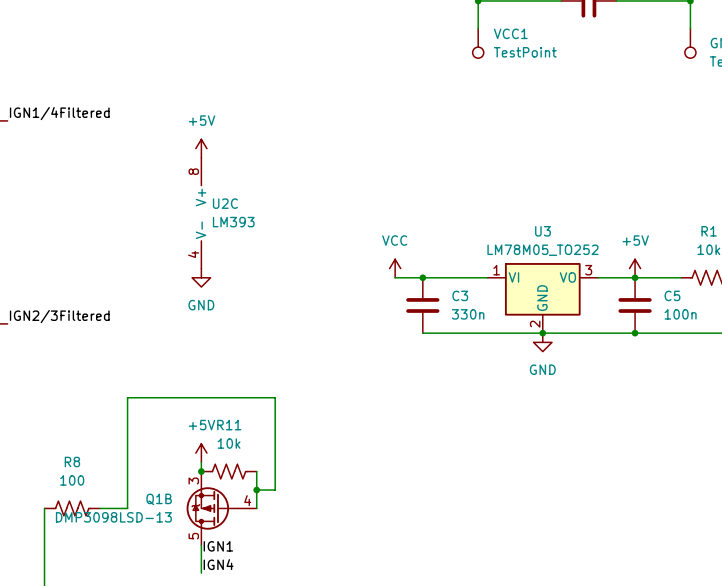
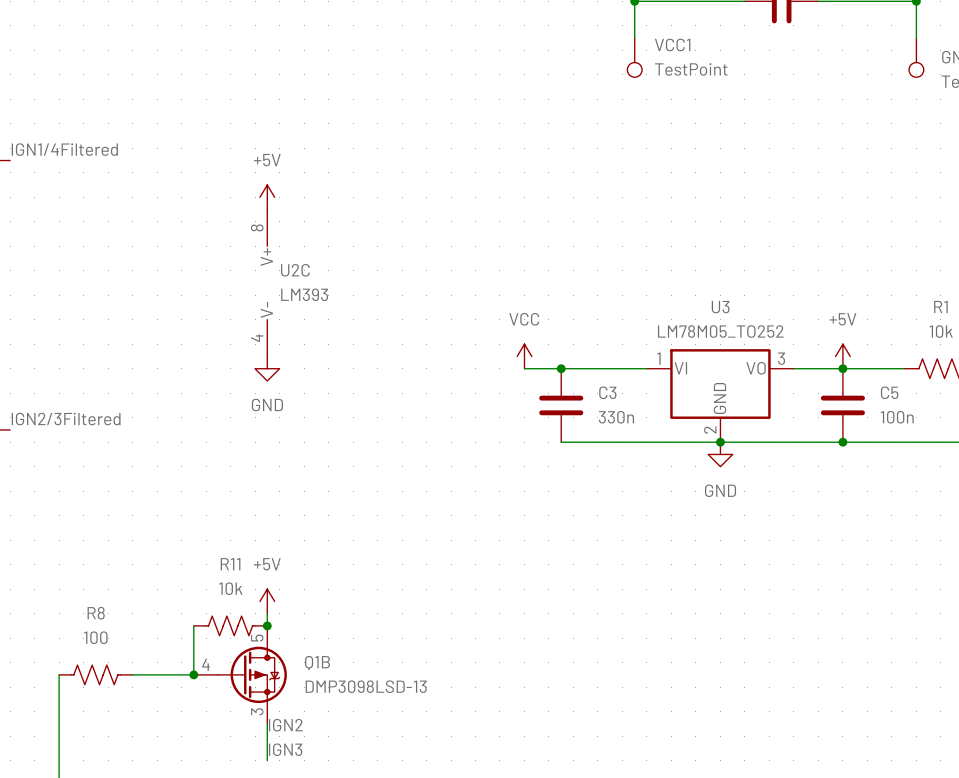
R11 position: (229, 471) -> (230, 625)
wire: (256, 471) (256, 508) -> none
wire: (256, 490) (275, 490) (275, 397) (127, 397) (127, 508) -> (193, 625) (193, 674) (169, 674)
junction: (256, 490) -> none
Q1B name position: Q1B (159, 499) -> Q1B (317, 663)
junction: none -> (193, 674)
Q1B rotation: 0° (212, 508) -> 180° (252, 674)
Q1B value position: DMP3098LSD-13 (113, 517) -> DMP3098LSD-13 (366, 686)
label: IGN1 (218, 546) -> IGN2 (285, 725)
label: IGN4 (218, 564) -> IGN3 (285, 749)

